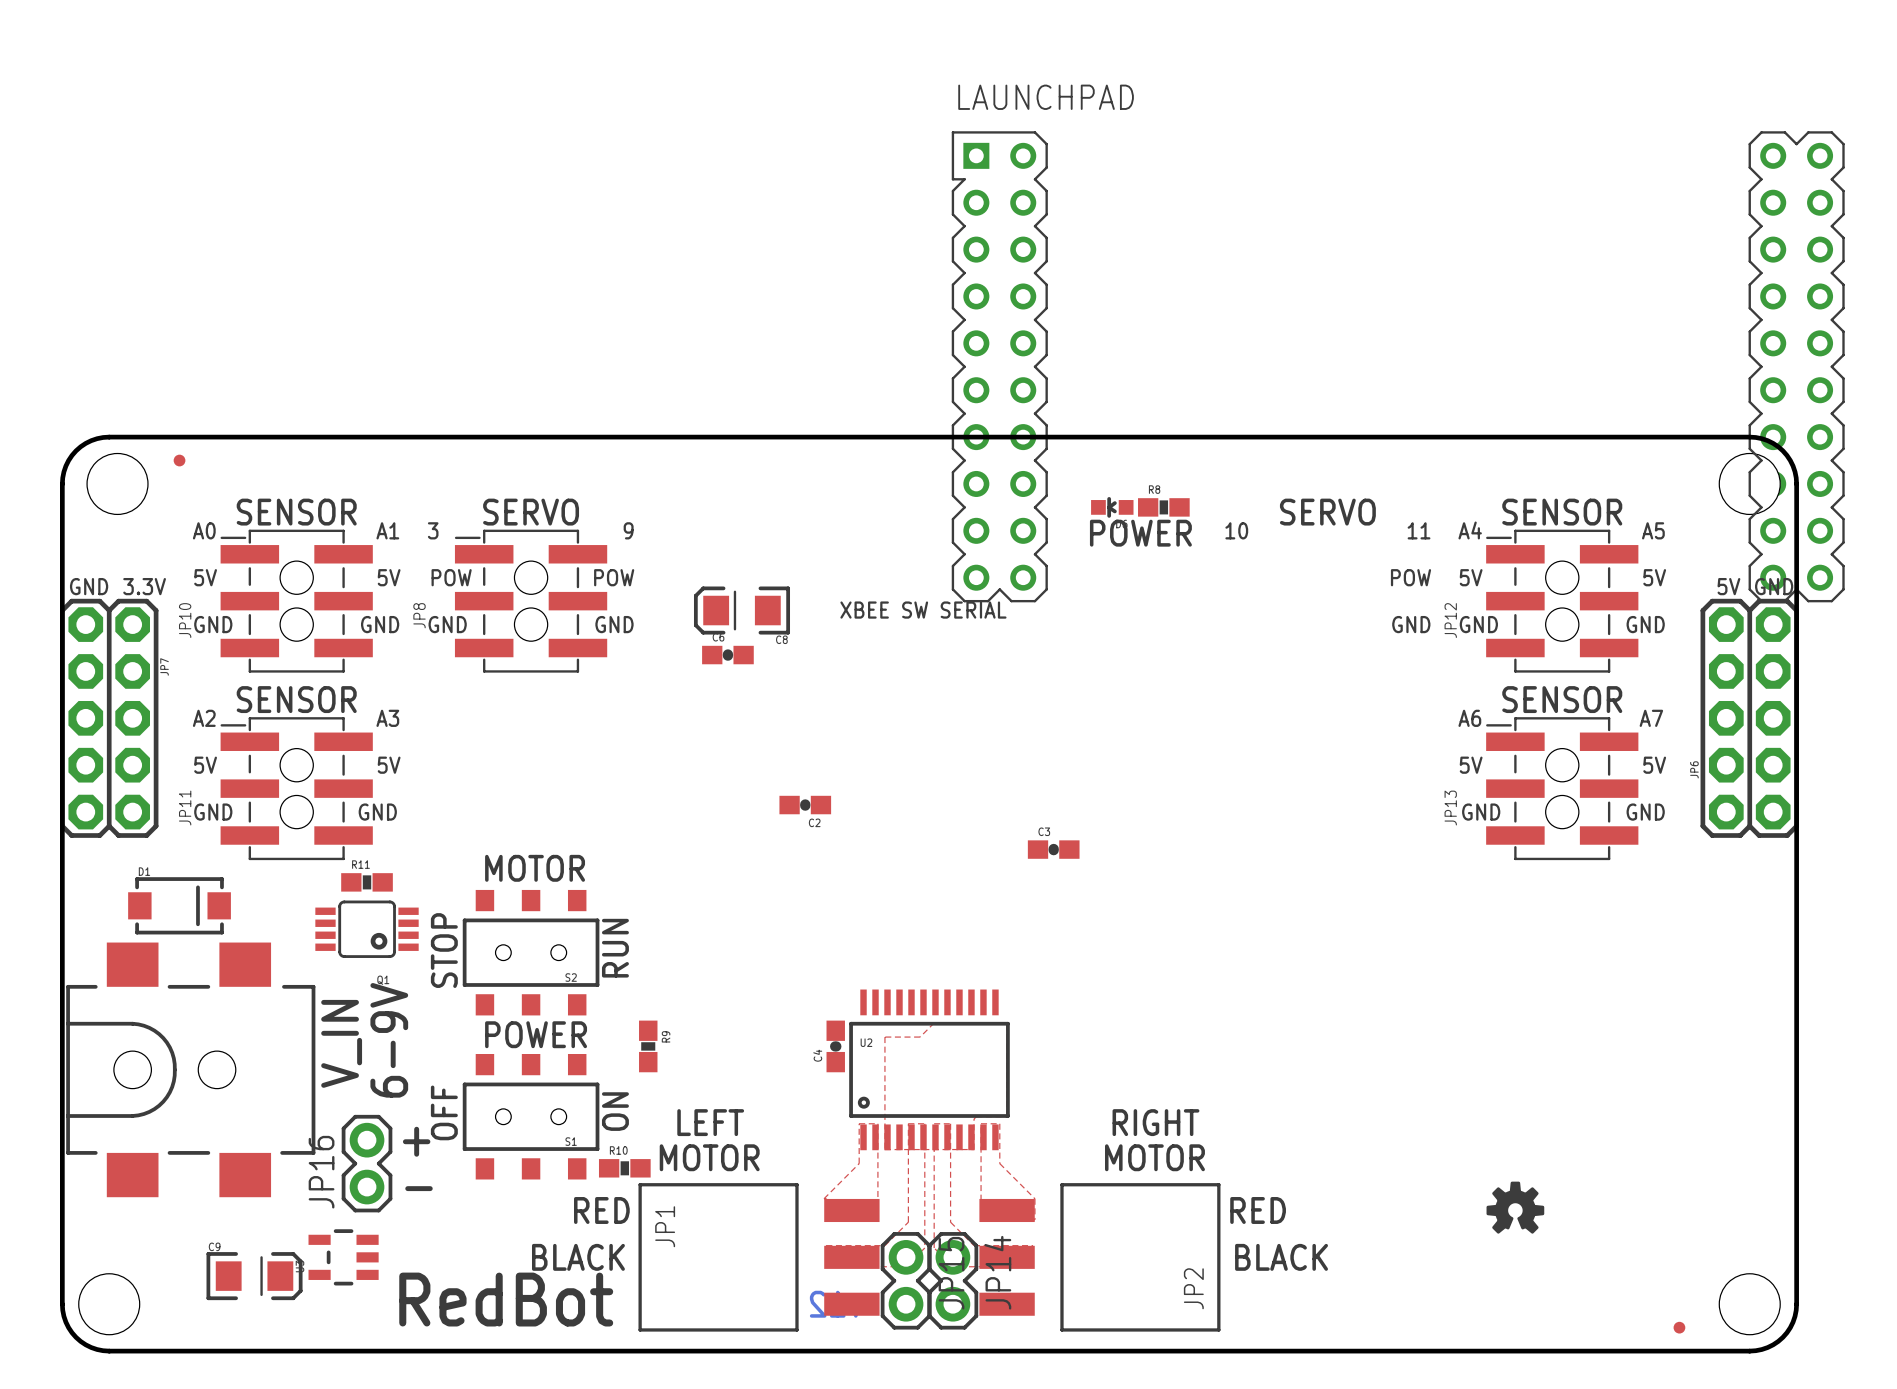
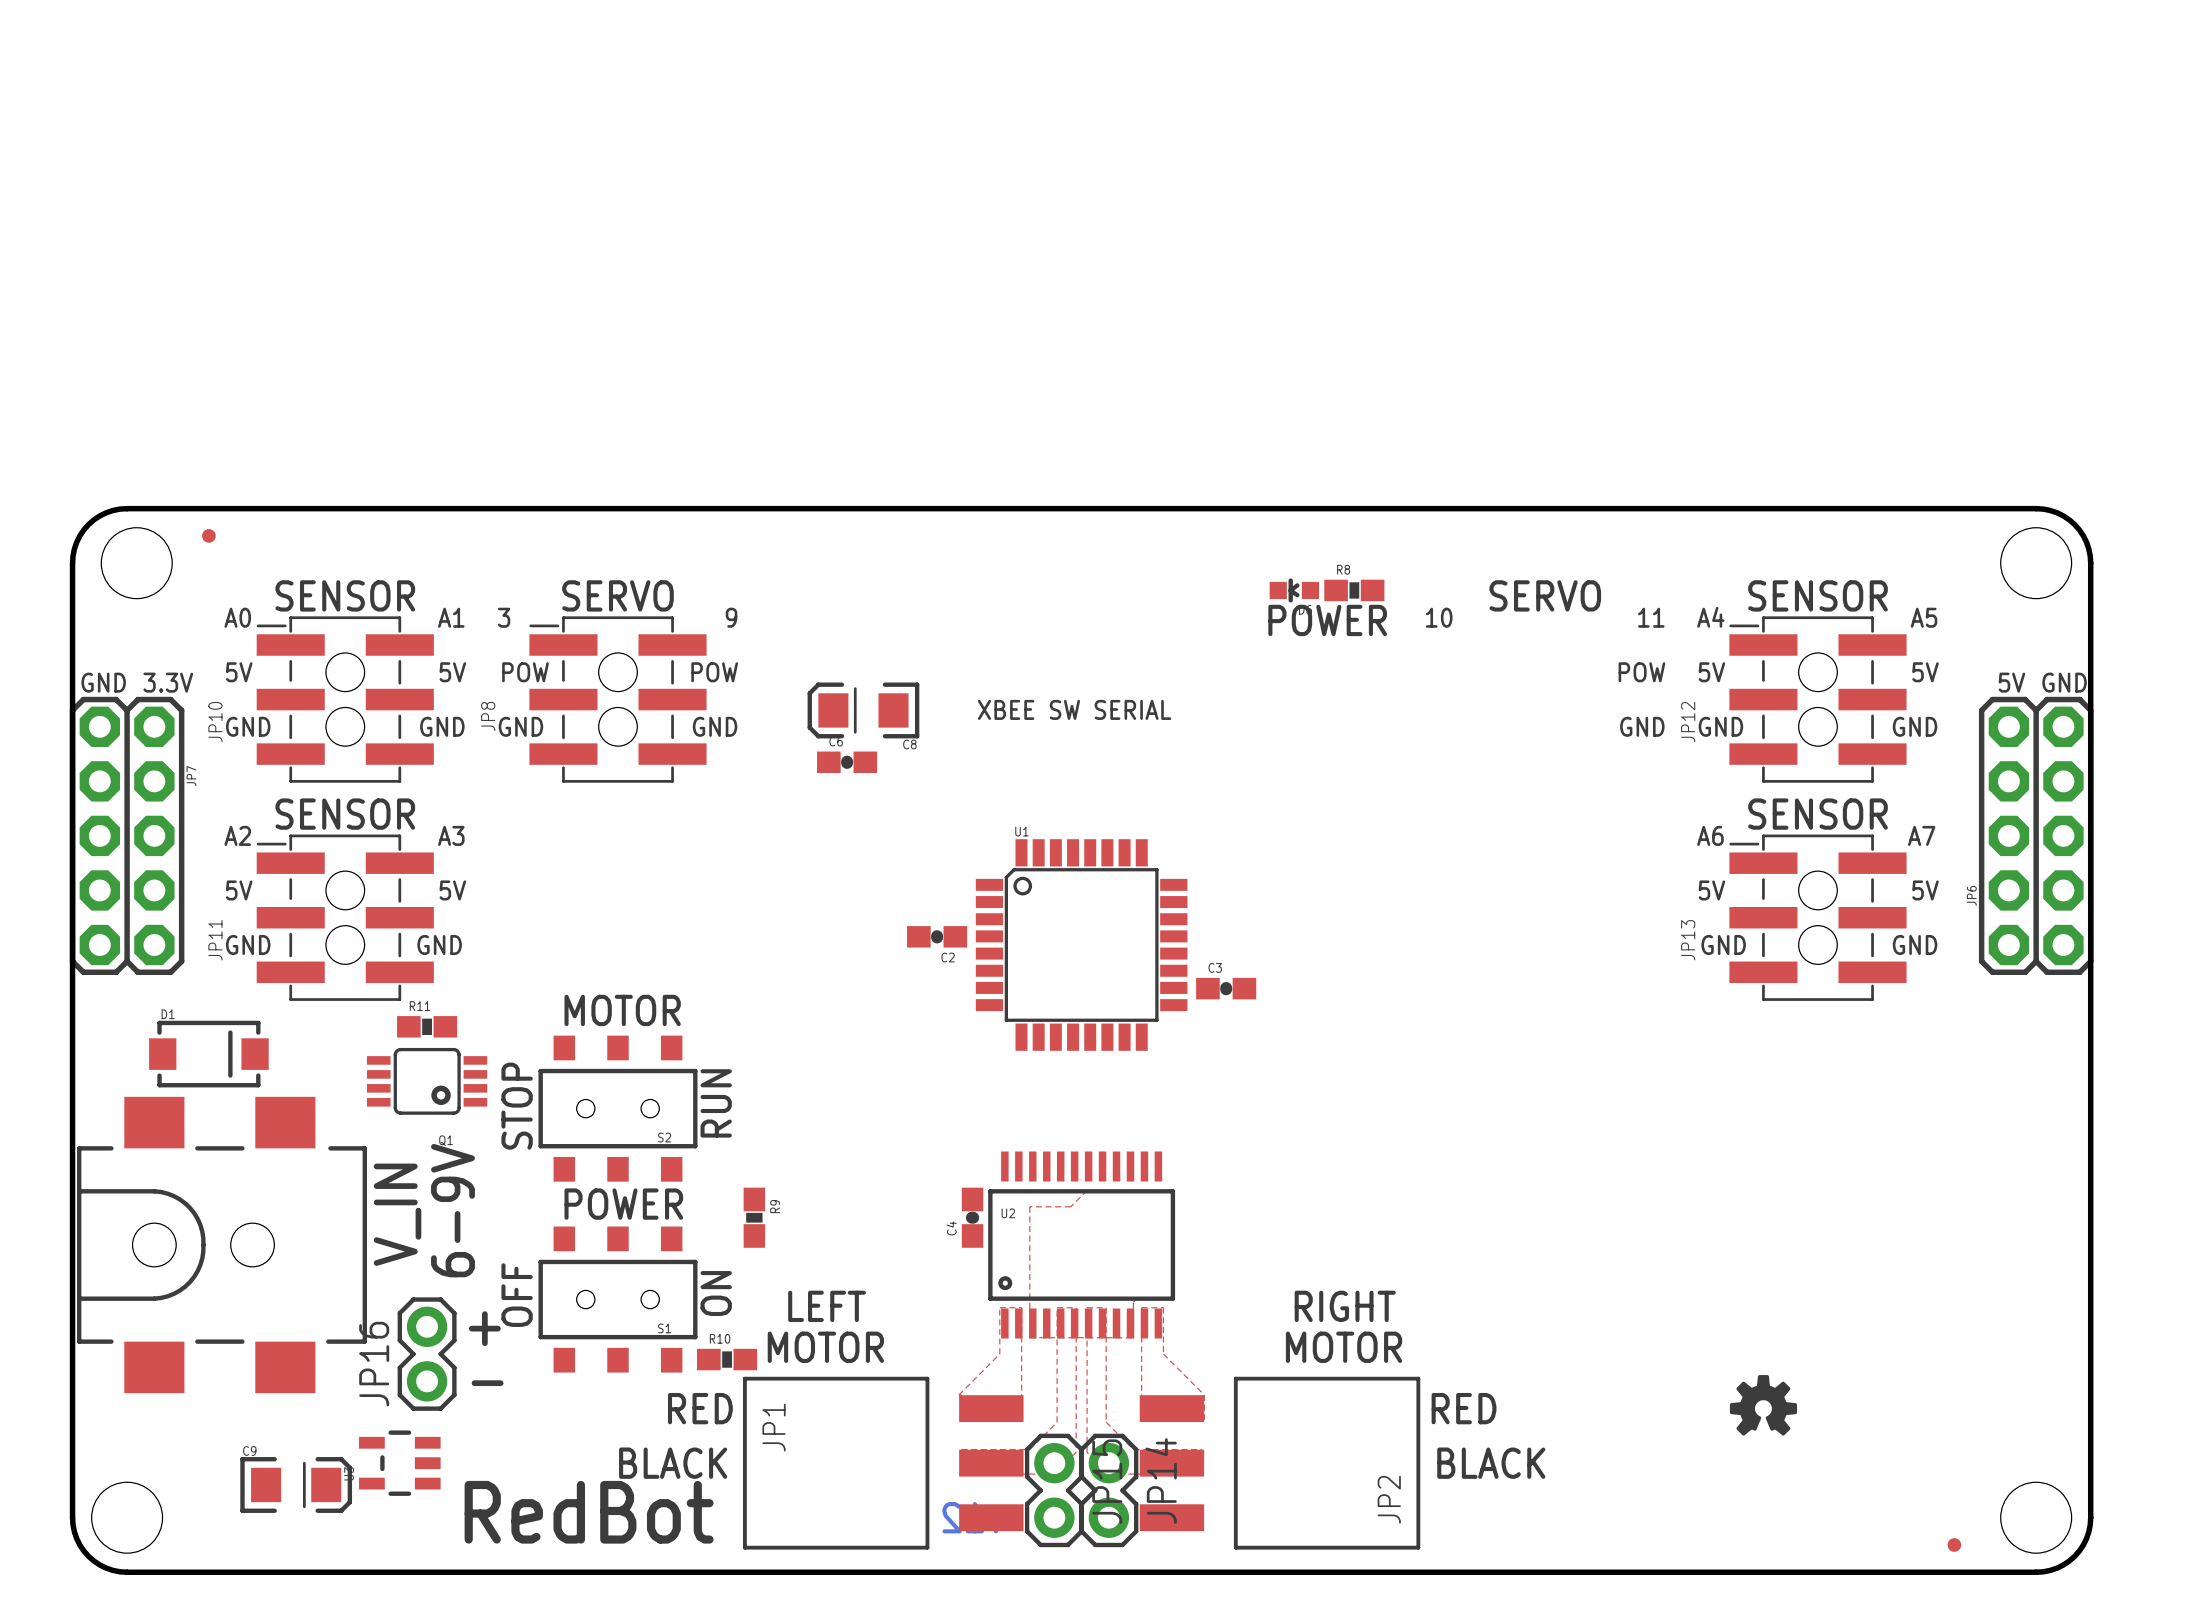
LAUNCHPAD: (1398, 366) -> none
U1: none -> (1081, 945)

